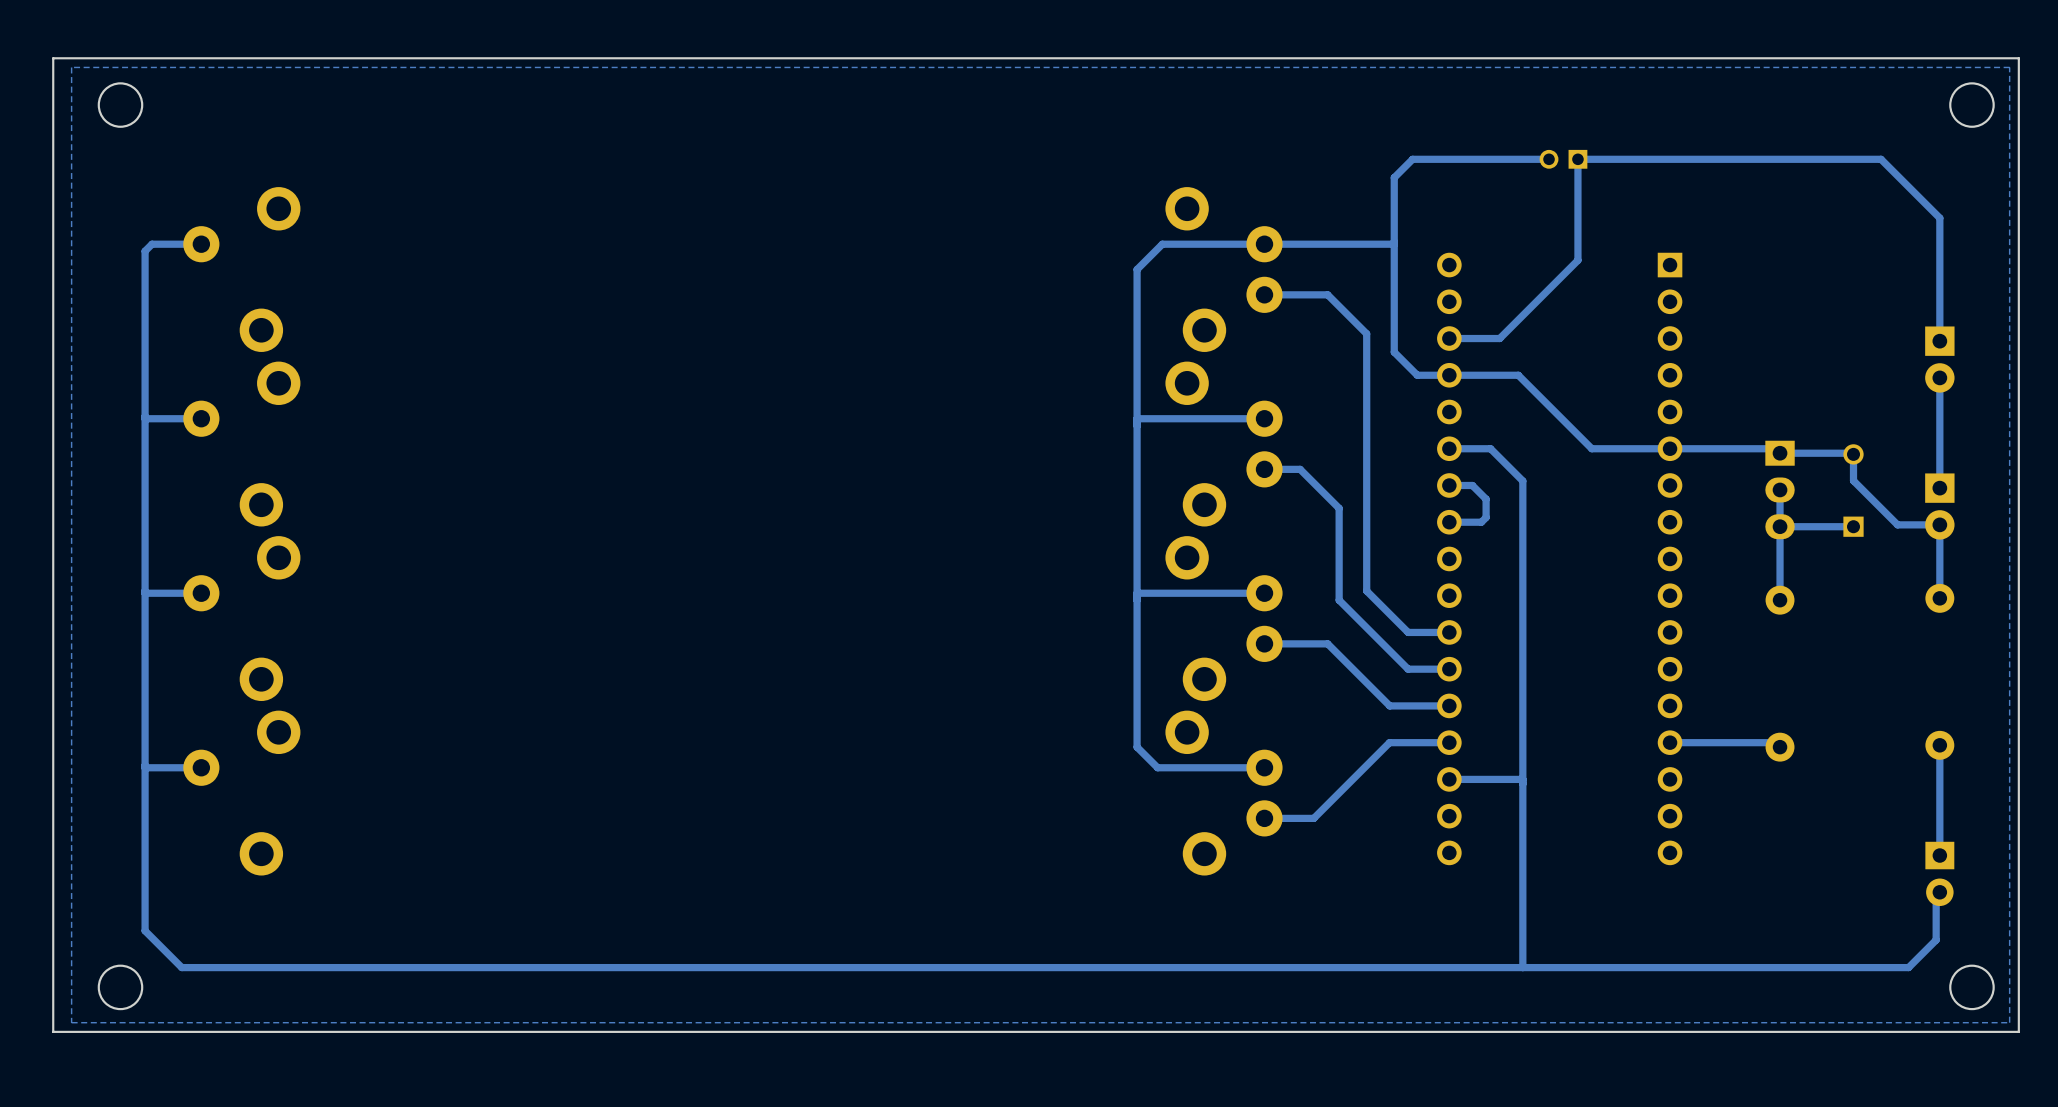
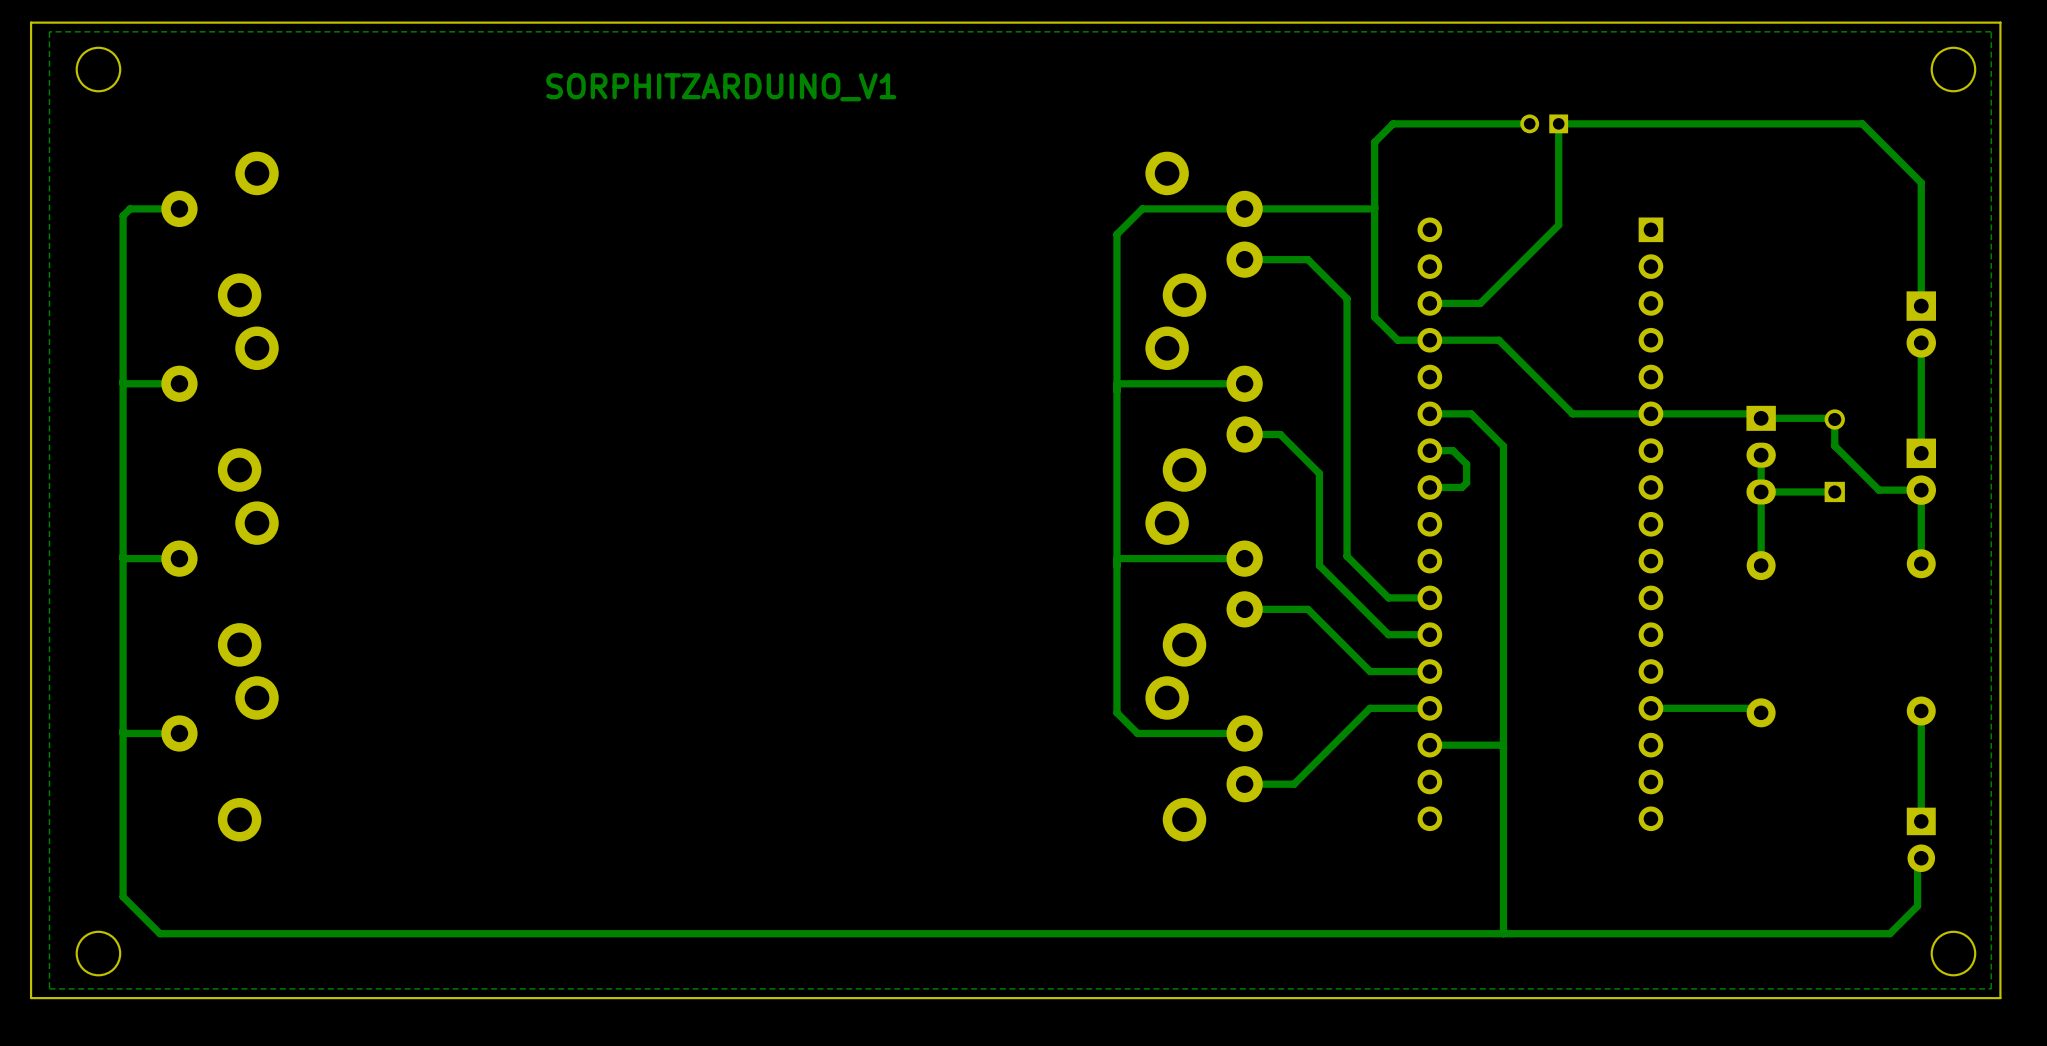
text: none -> SORPHITZARDUINO_V1 (721, 87)

